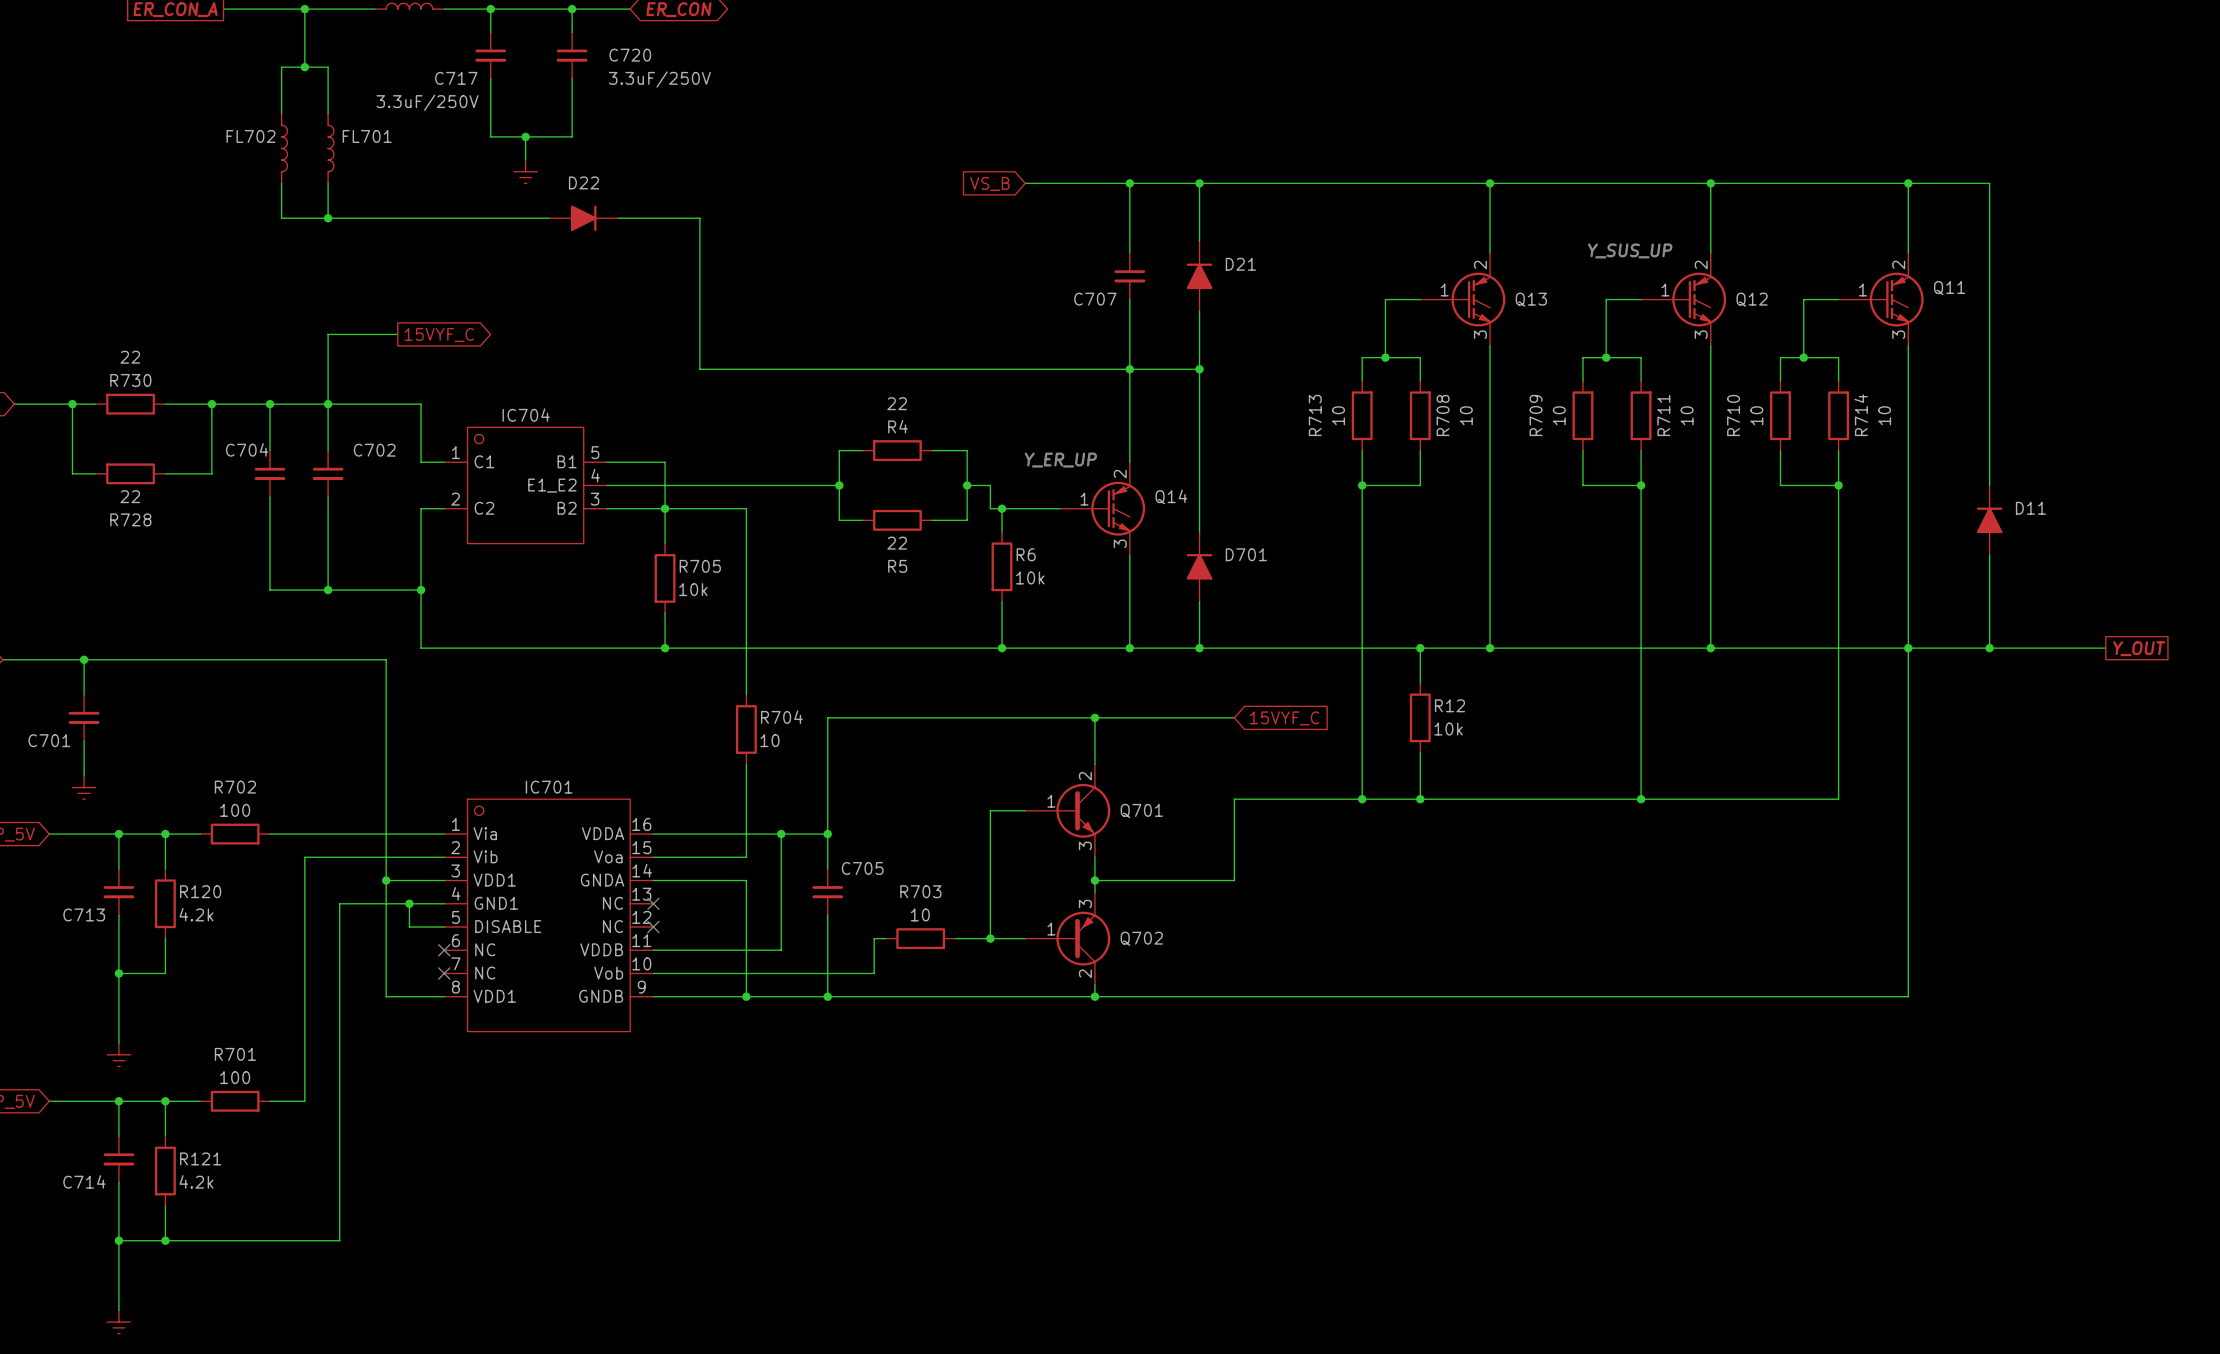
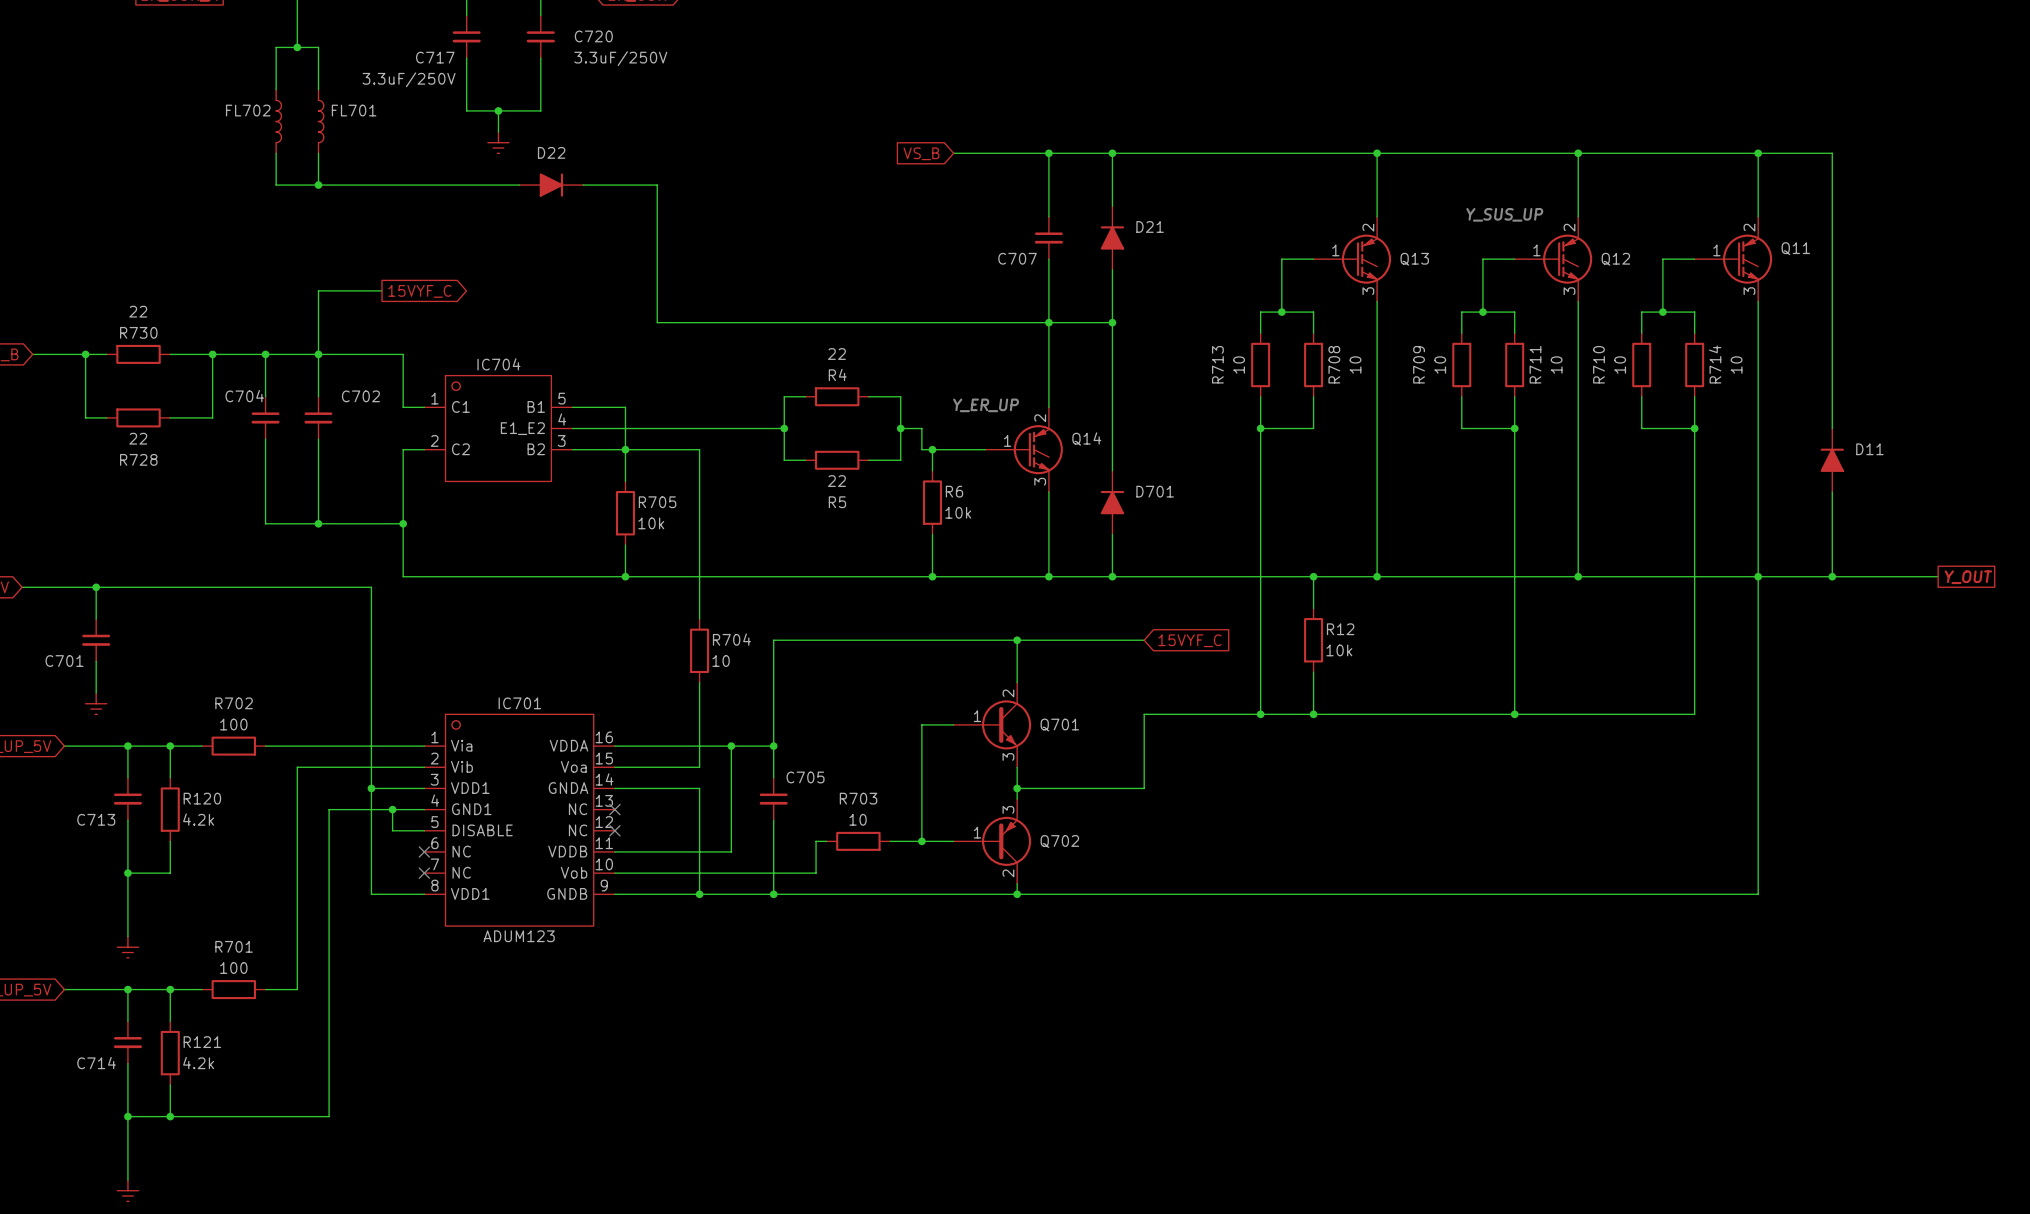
IC701 value: none -> ADUM123 (519, 936)

